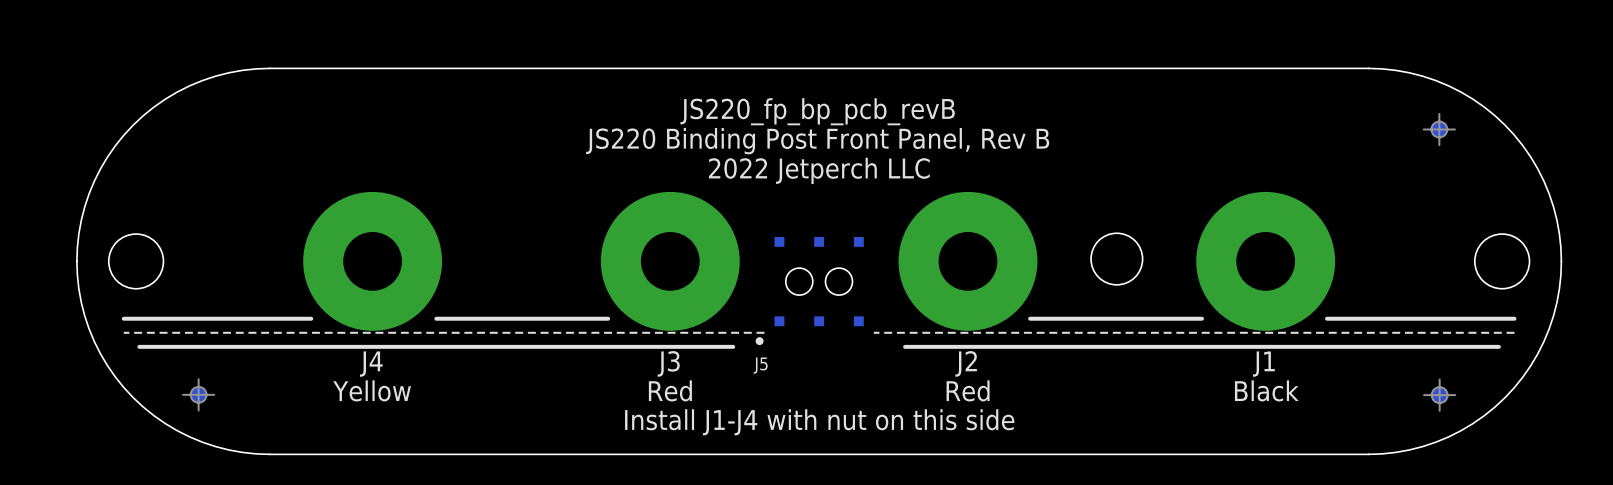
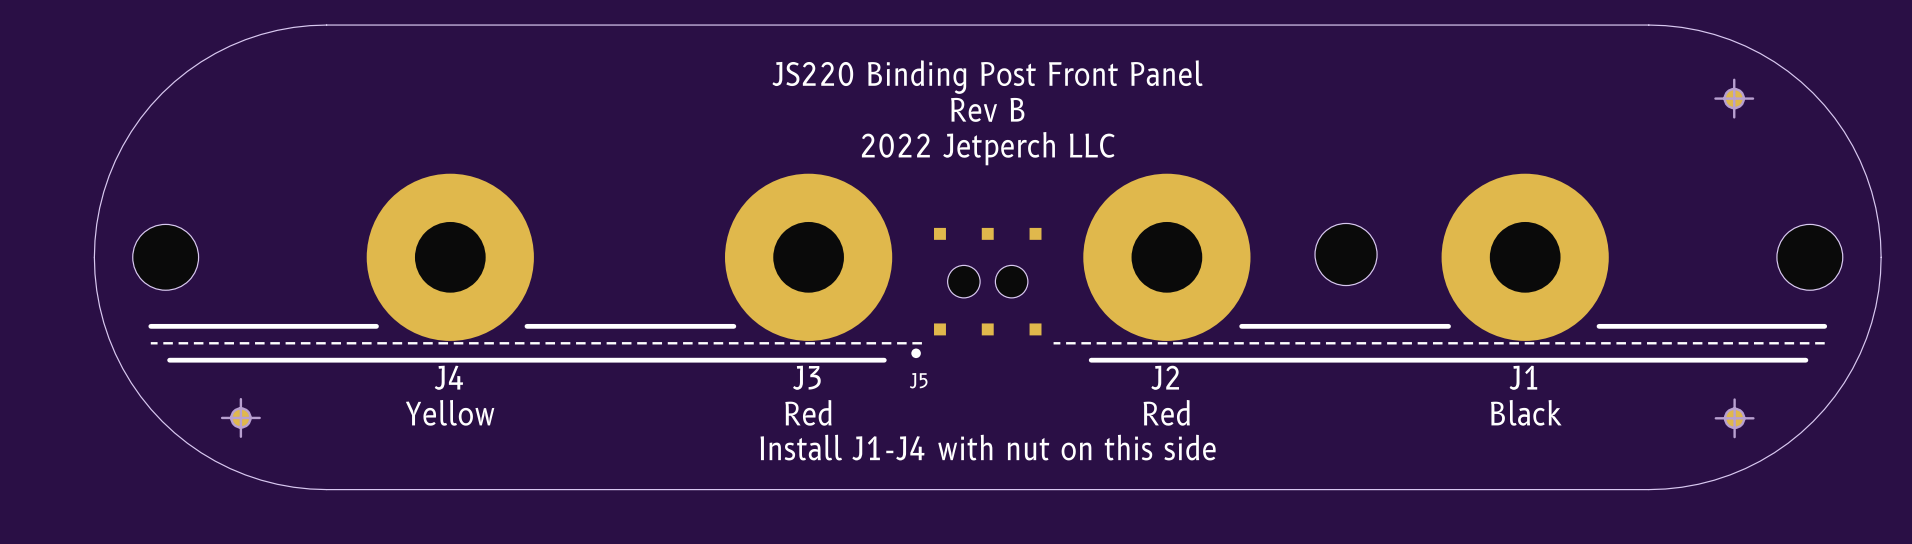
text: JS220_fp_bp_pcb_revB (817, 111) -> JS220 Binding Post Front Panel (987, 77)
text: JS220 Binding Post Front Panel, Rev B (817, 141) -> Rev B (987, 109)

